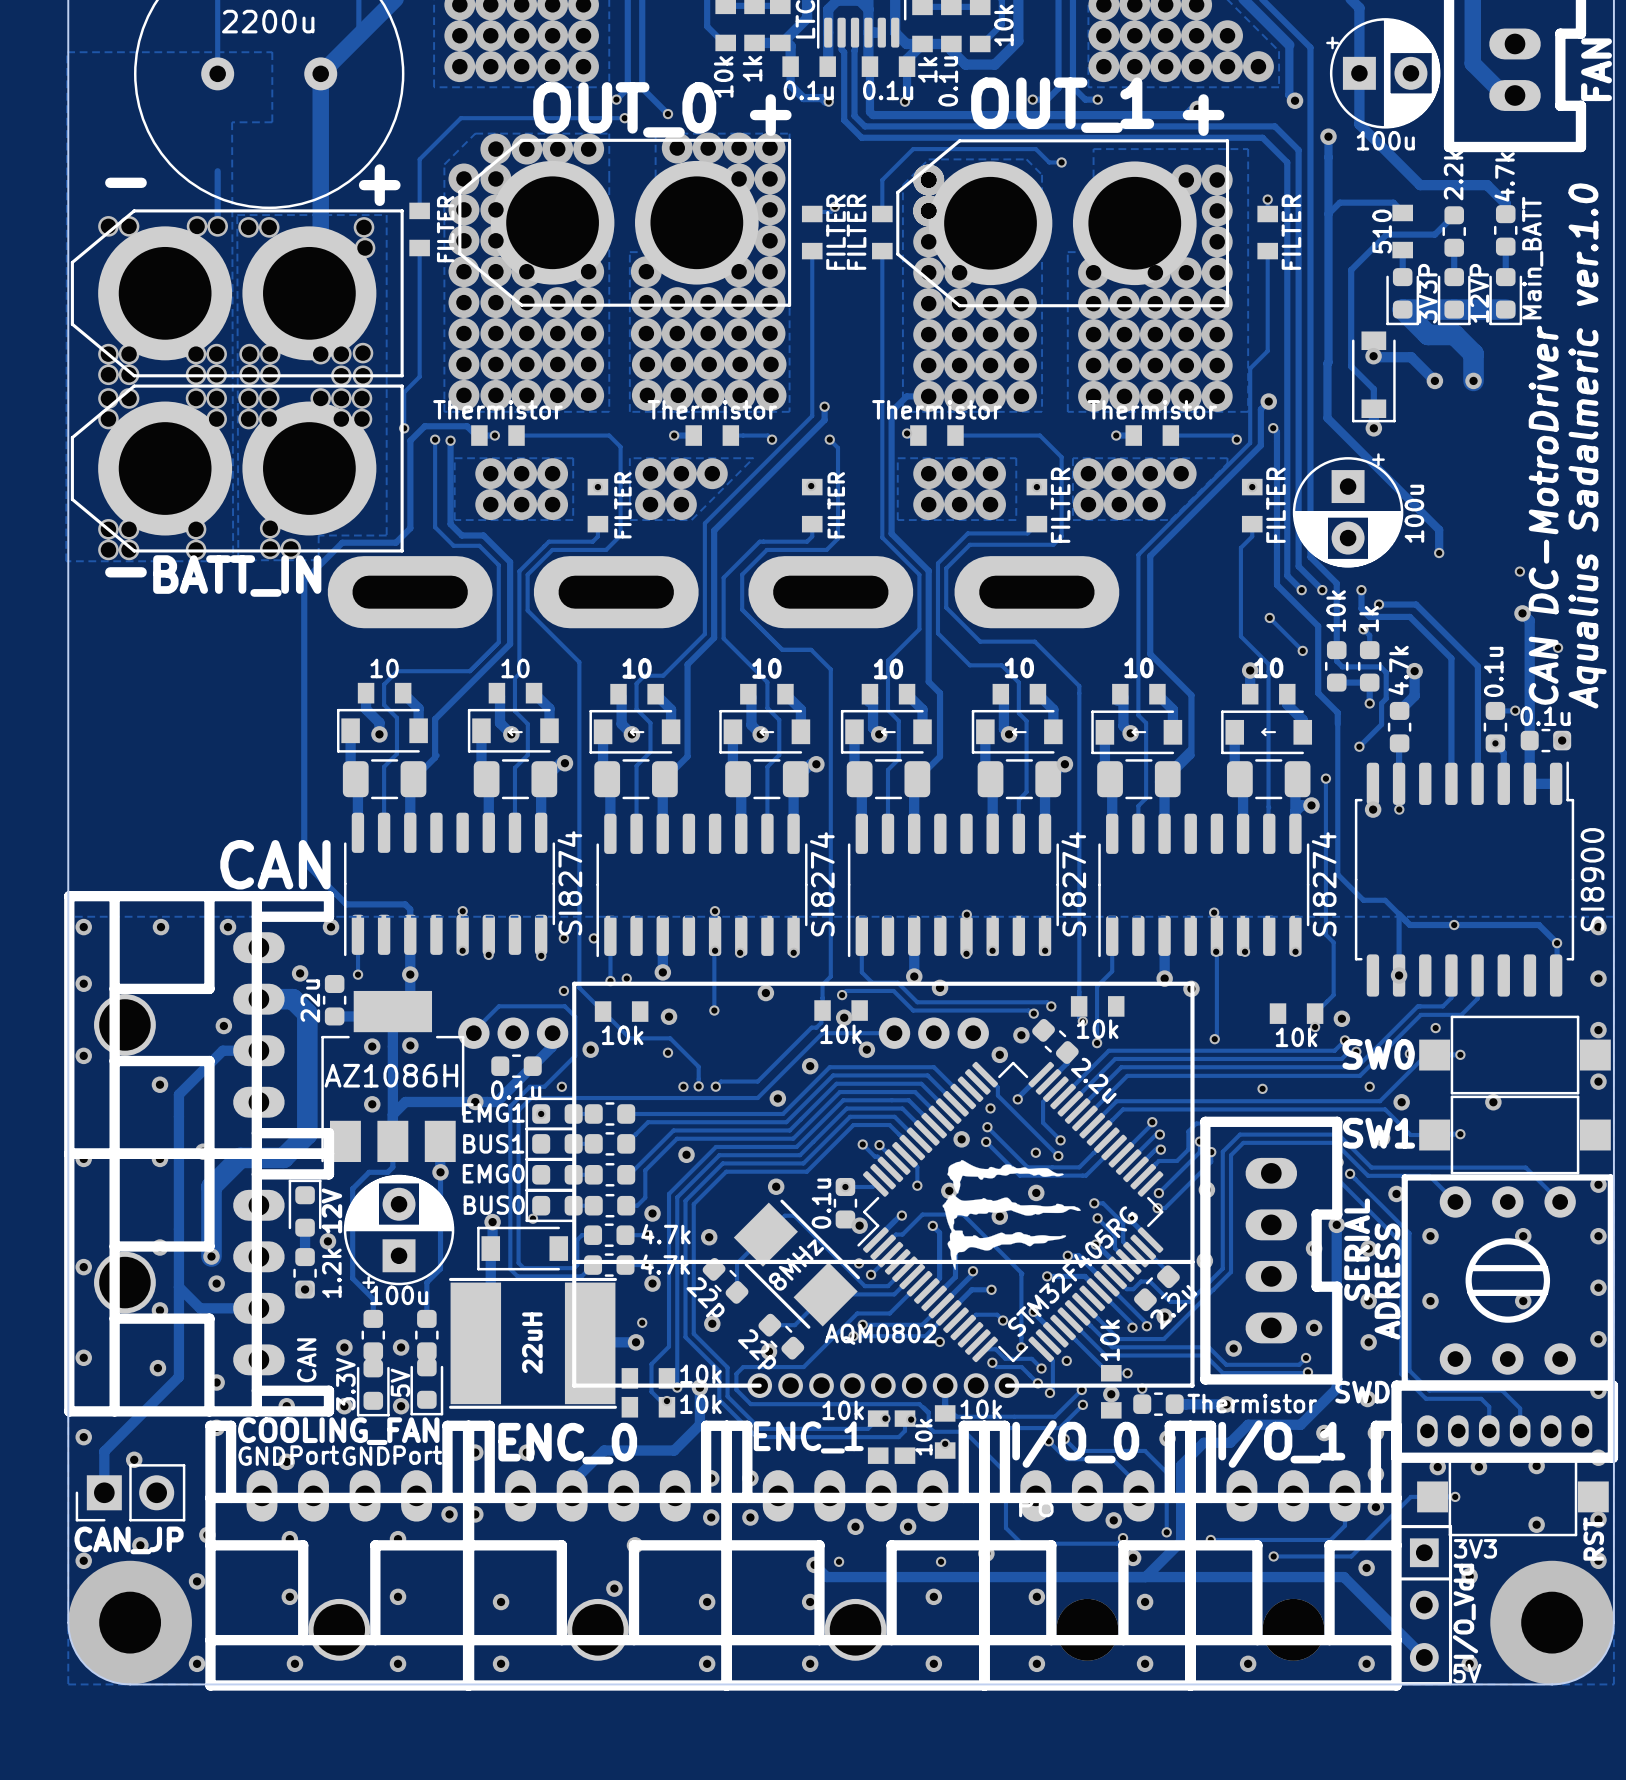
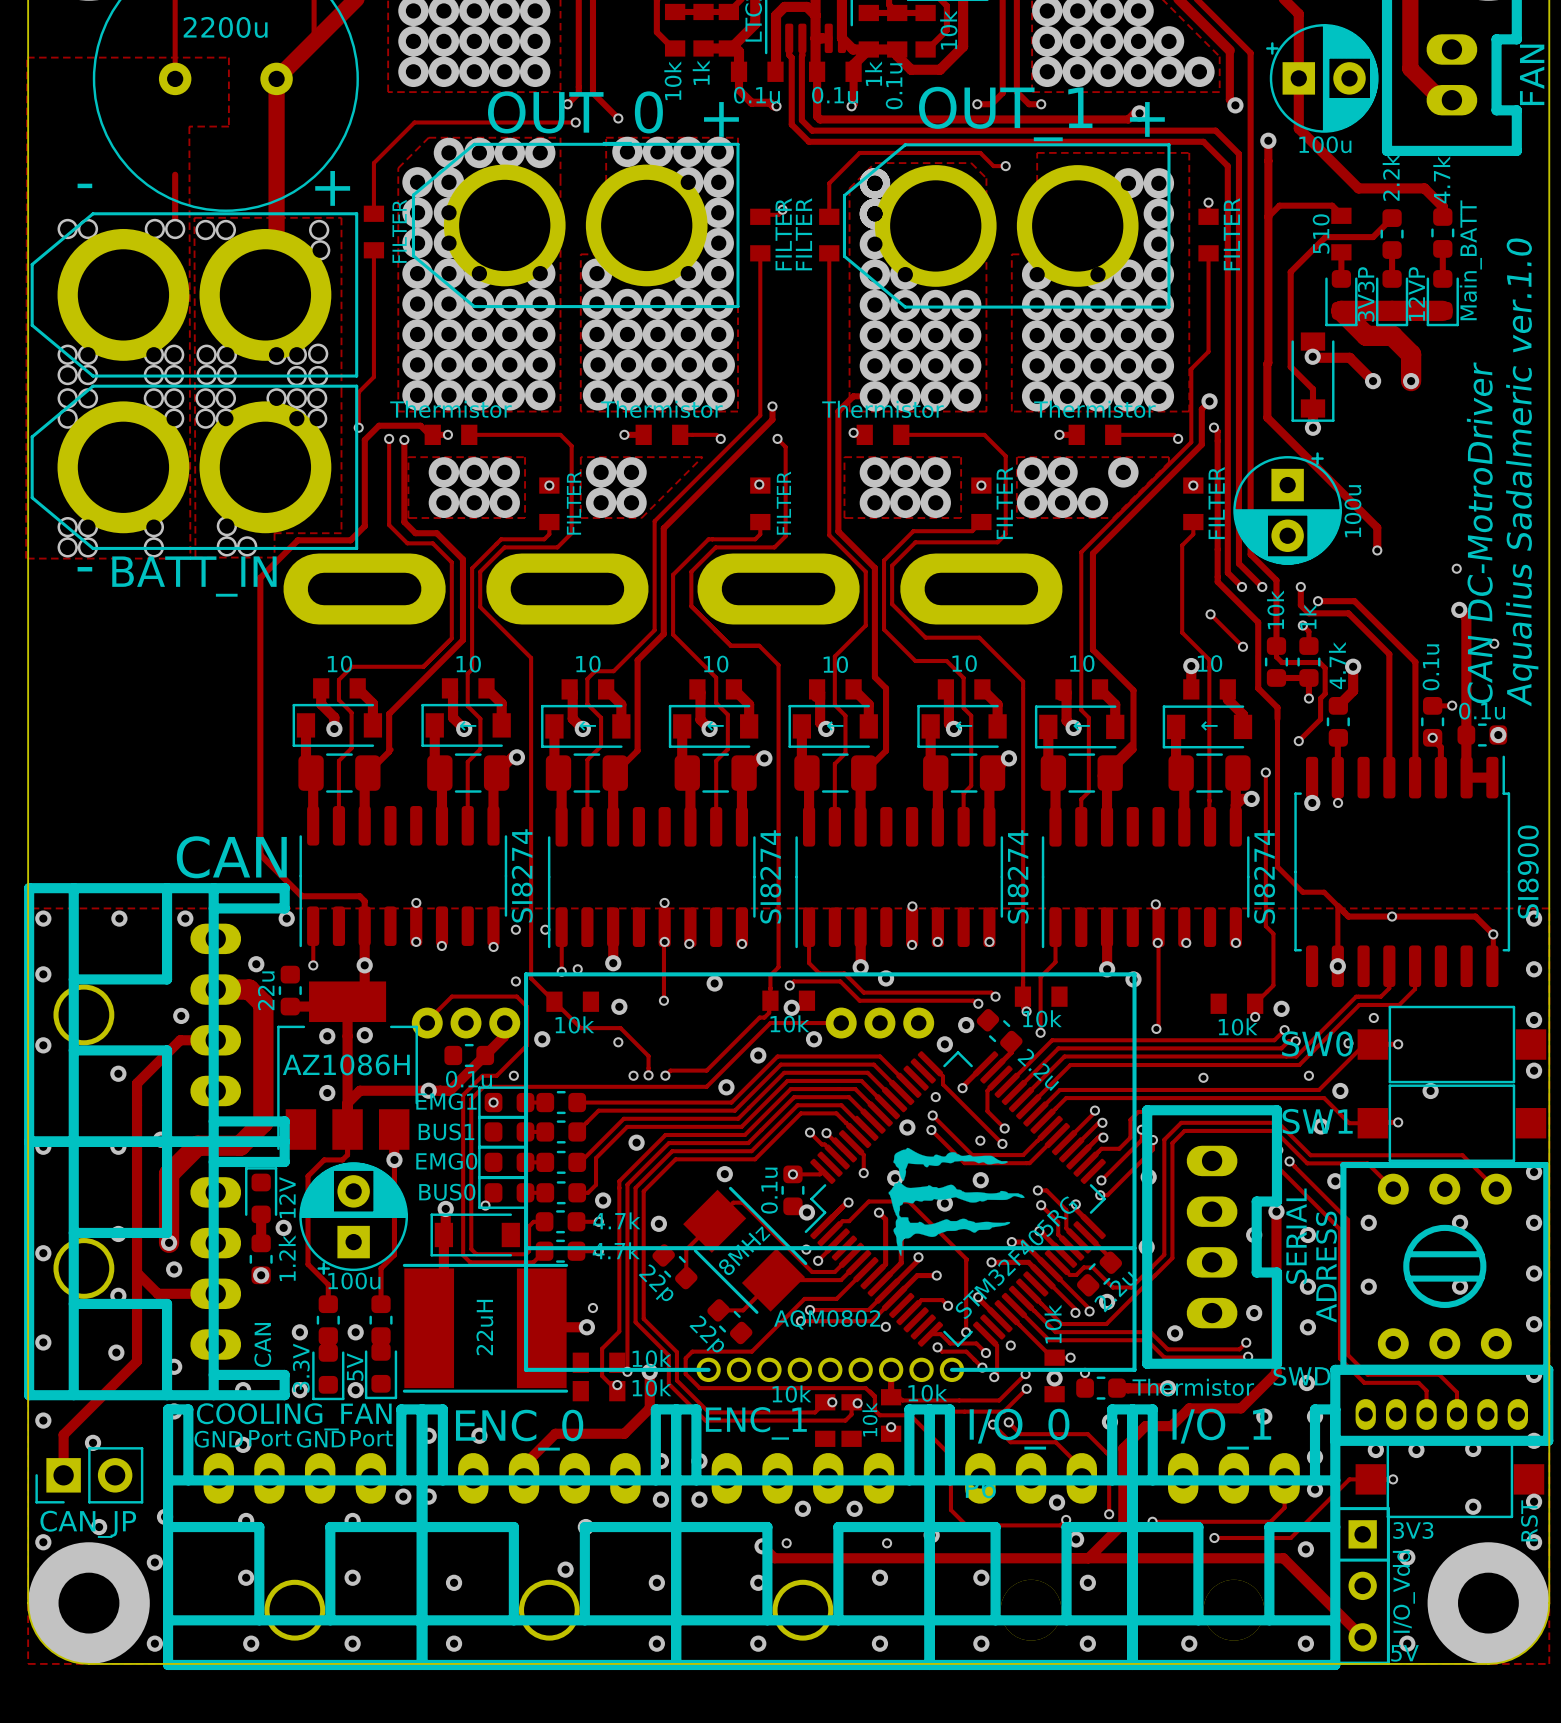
via: (712, 473) -> none
via: (1150, 473) -> none
via: (652, 1283) -> none
via: (712, 1323) -> none
via: (768, 1351) -> none

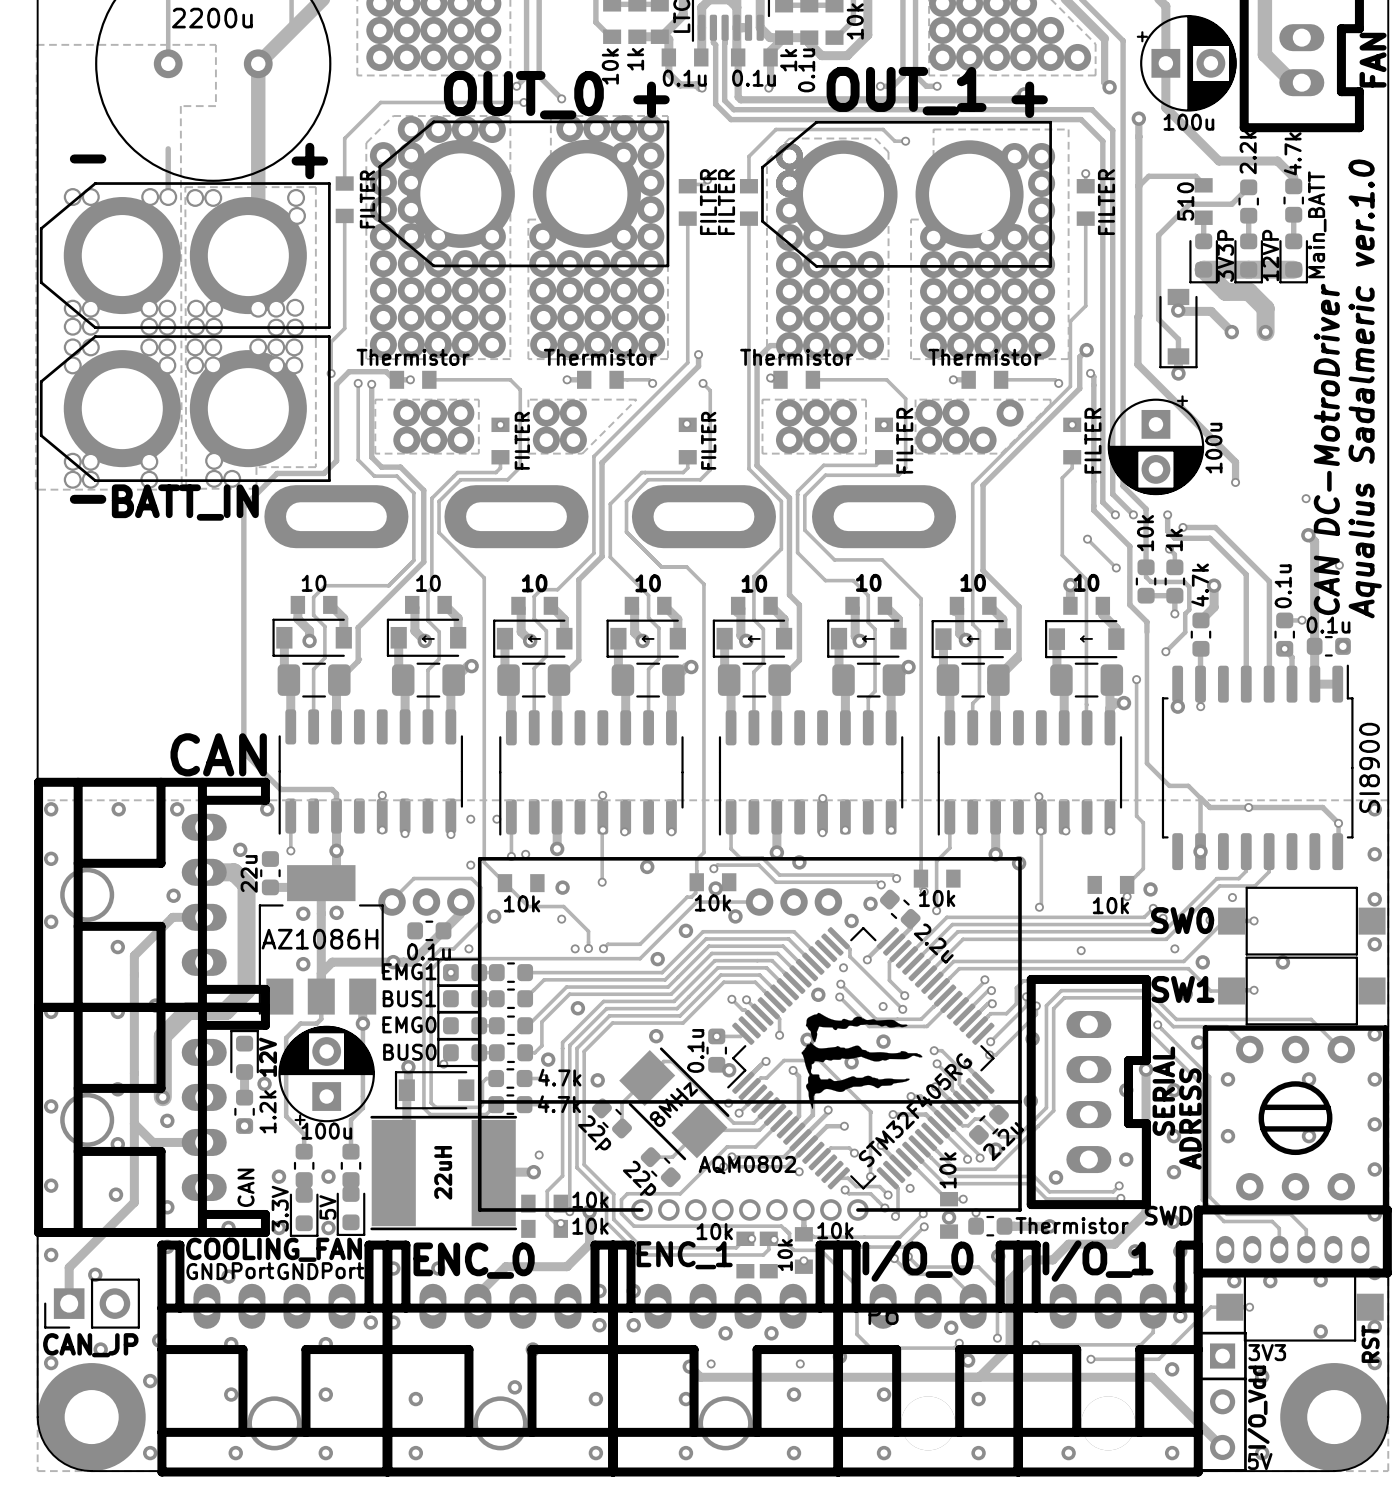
part value: SI8274 (522, 875) -> none
part value: SI8274 (770, 876) -> none
part value: SI8274 (1018, 876) -> none
part value: SI8274 (1264, 876) -> none

